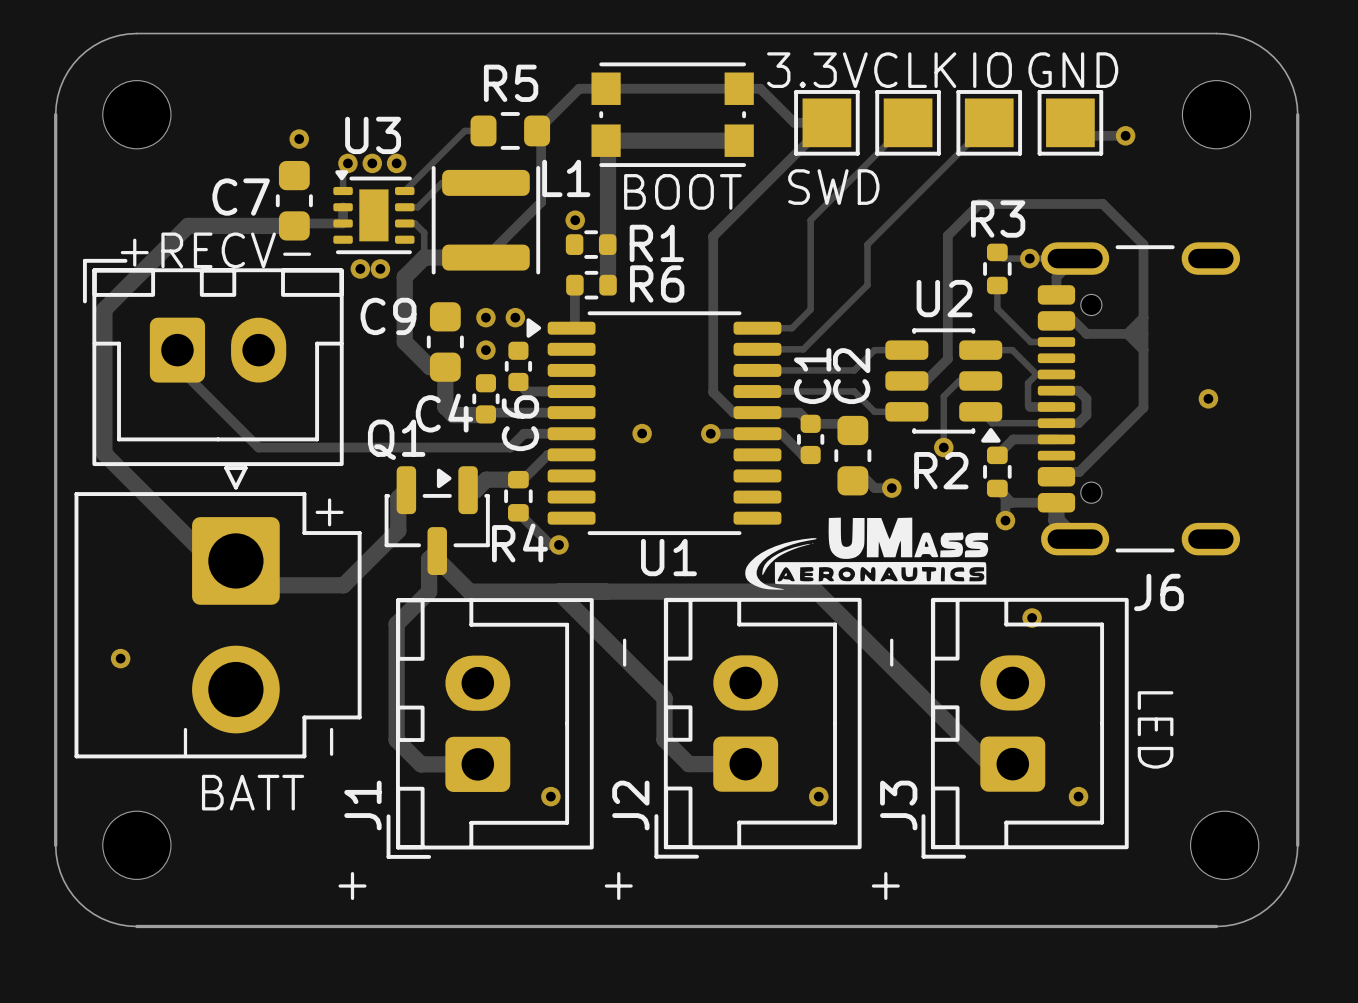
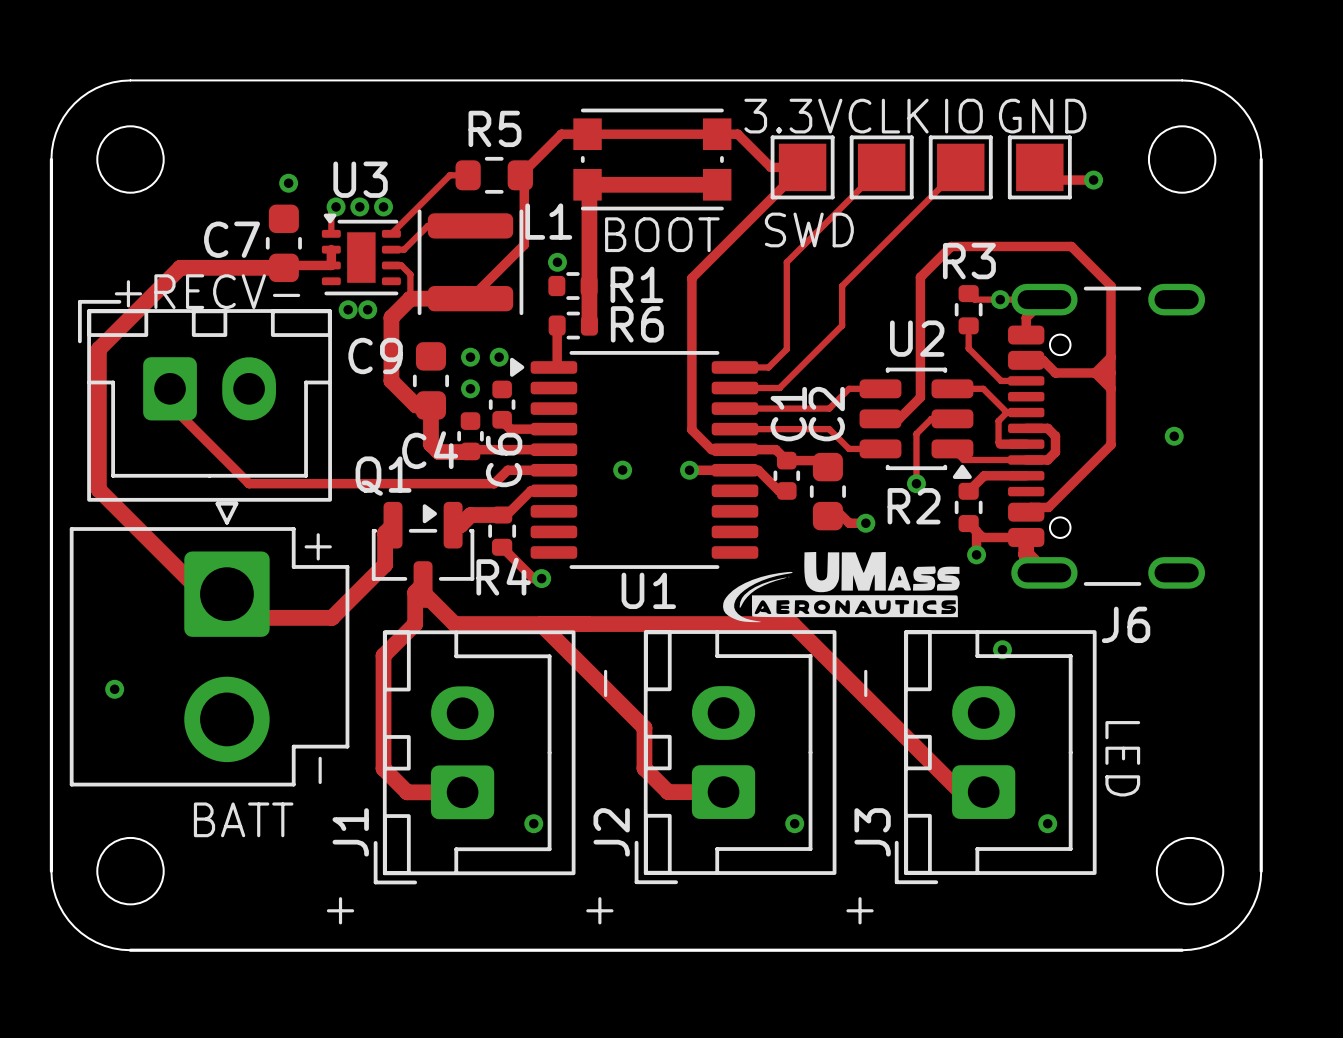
text: - (185, 741) -> none

